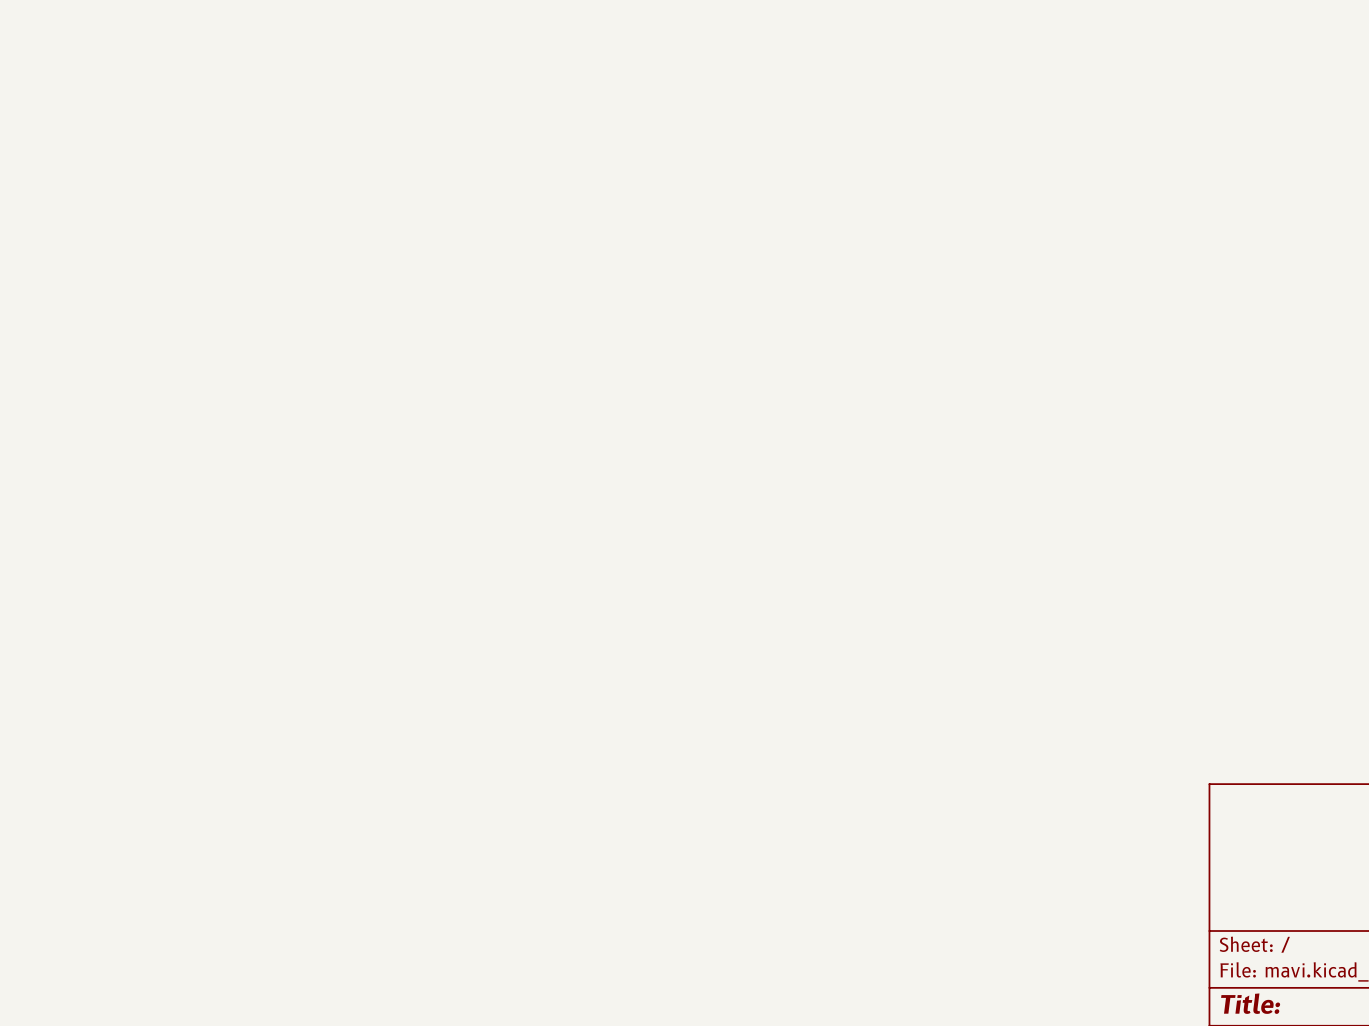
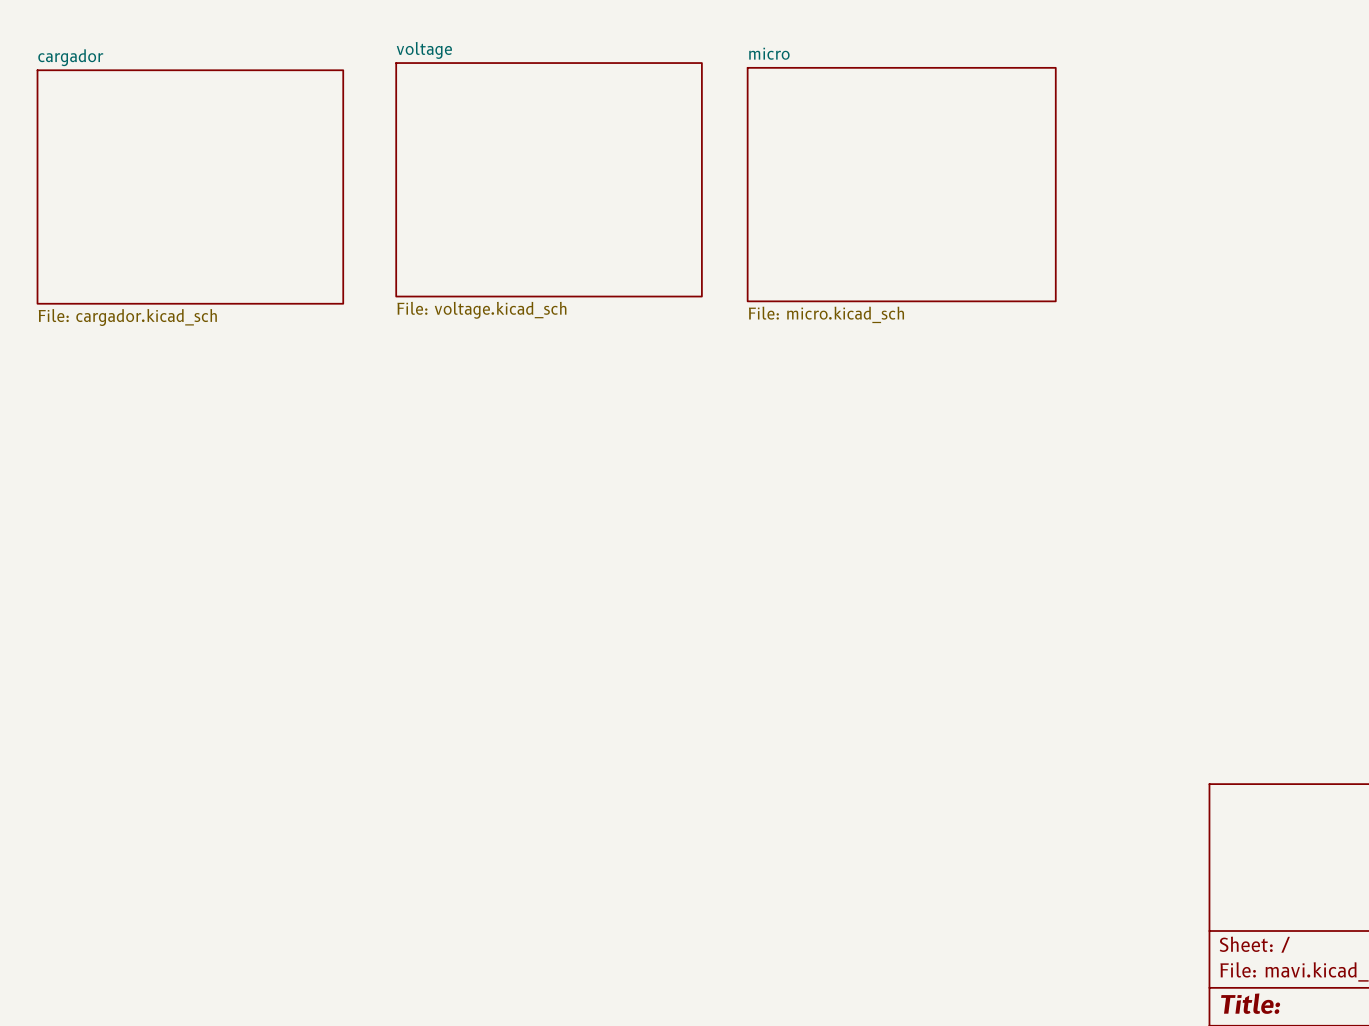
sheet voltage: none -> File: voltage.kicad_sch (549, 179)
sheet micro: none -> File: micro.kicad_sch (901, 184)
sheet cargador: none -> File: cargador.kicad_sch (190, 187)

